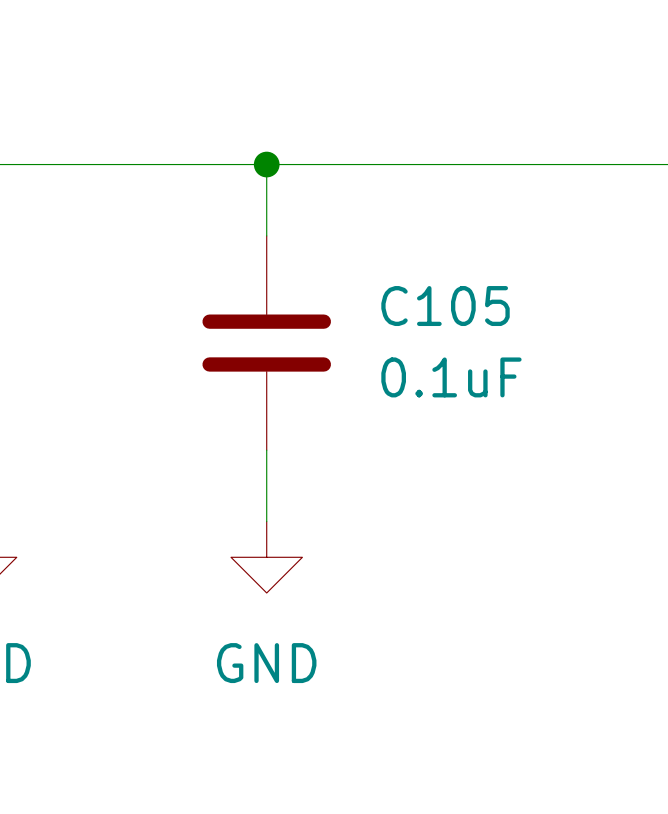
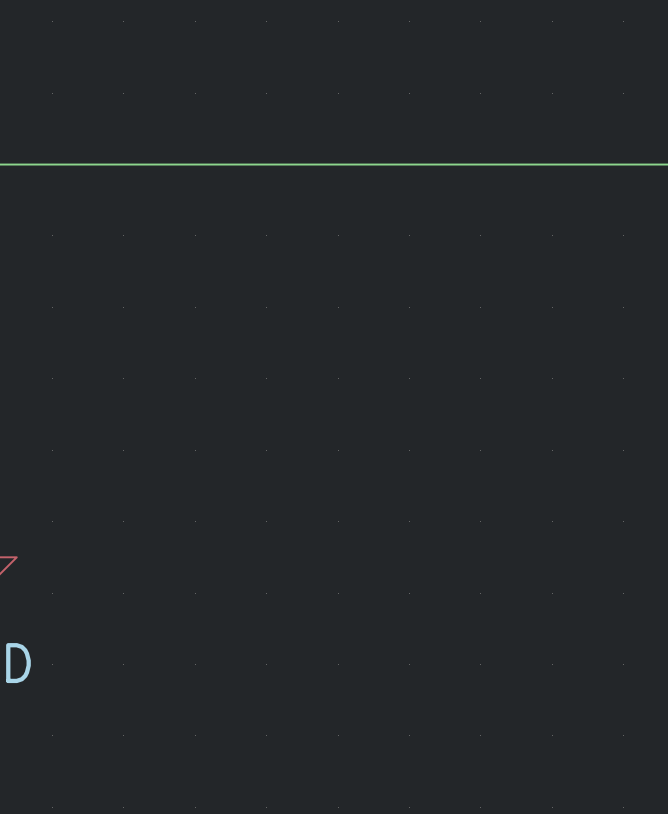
wire: (266, 164) (266, 235) -> none
junction: (266, 164) -> none
C105: 0.1uF (266, 343) -> none
wire: (266, 450) (266, 521) -> none
power symbol: GND (266, 557) -> none

